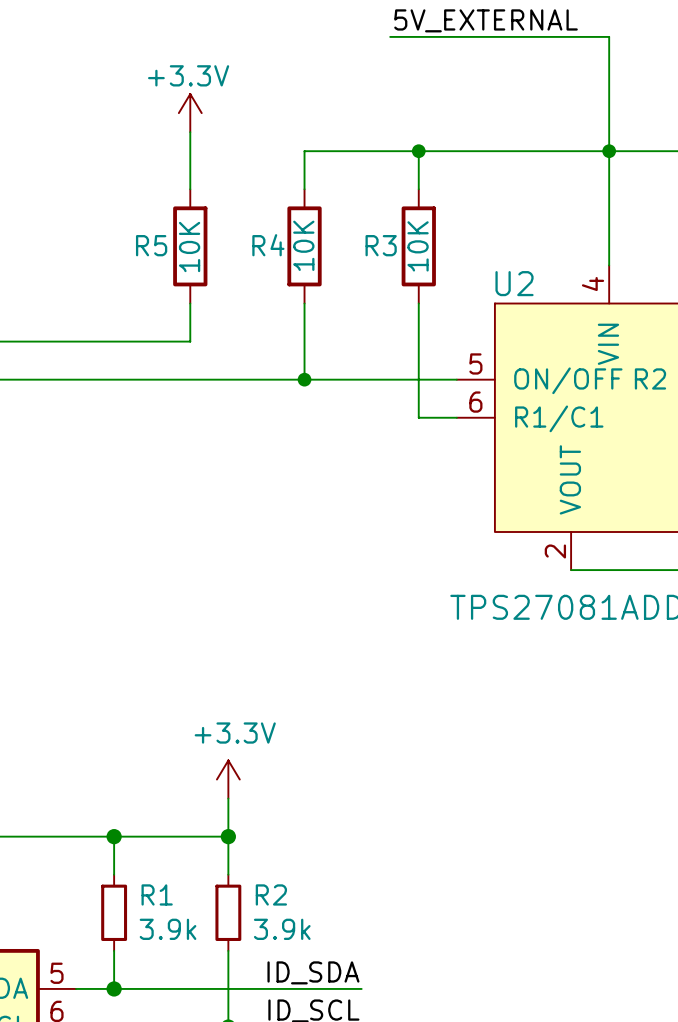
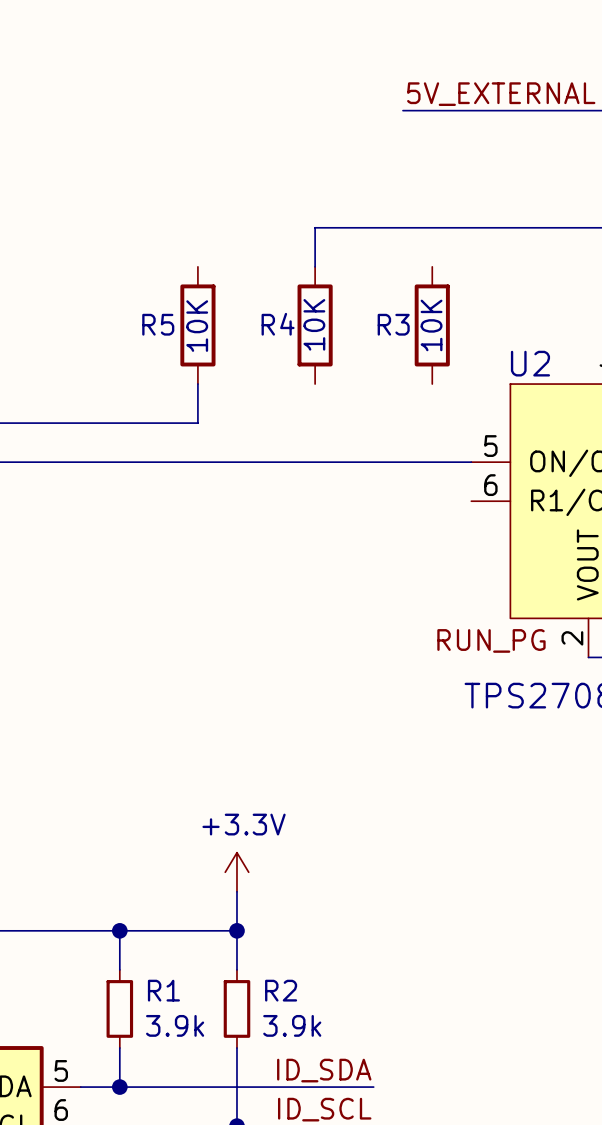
power symbol: +3.3V (190, 113) -> none
wire: (190, 132) (190, 189) -> none
wire: (418, 151) (418, 189) -> none
junction: (418, 151) -> none
wire: (304, 303) (304, 379) -> none
wire: (418, 303) (418, 417) (456, 417) -> none
junction: (304, 379) -> none
label: none -> RUN_PG (491, 640)

